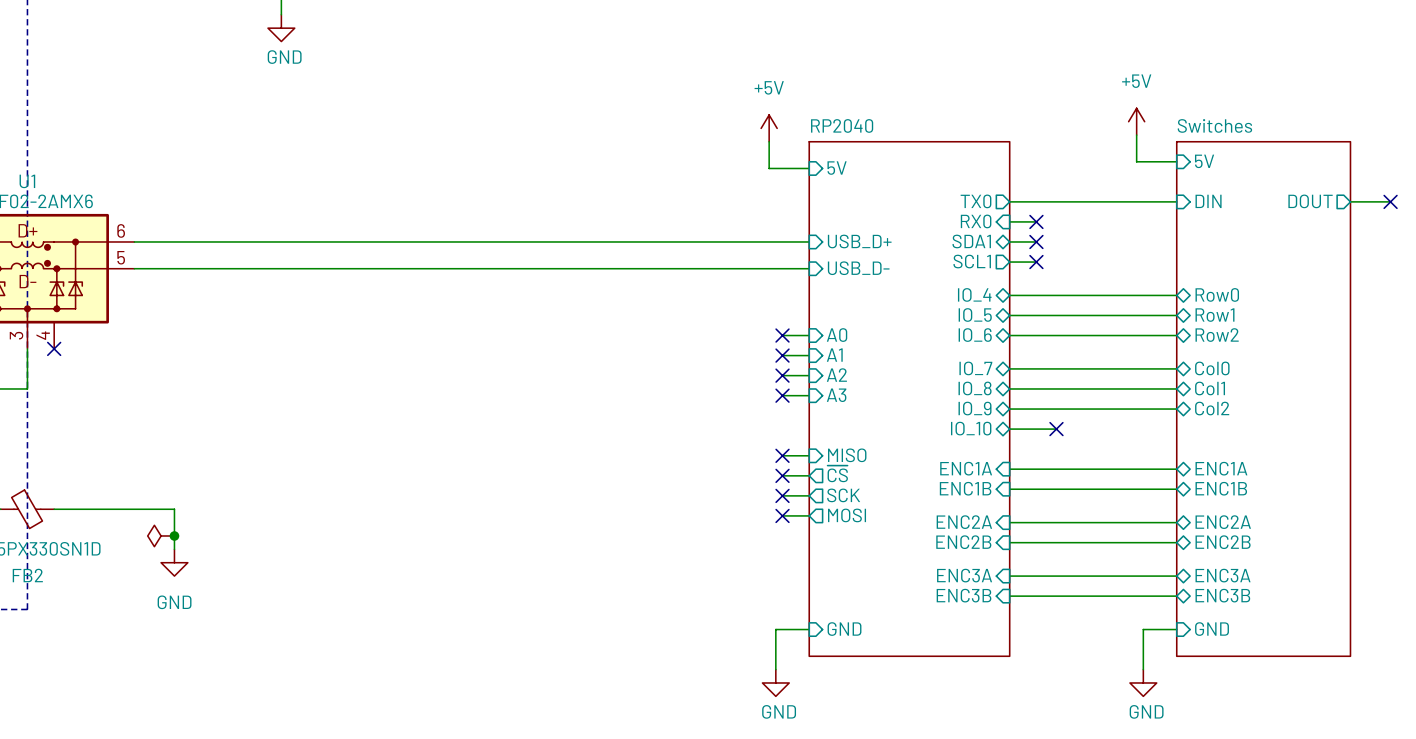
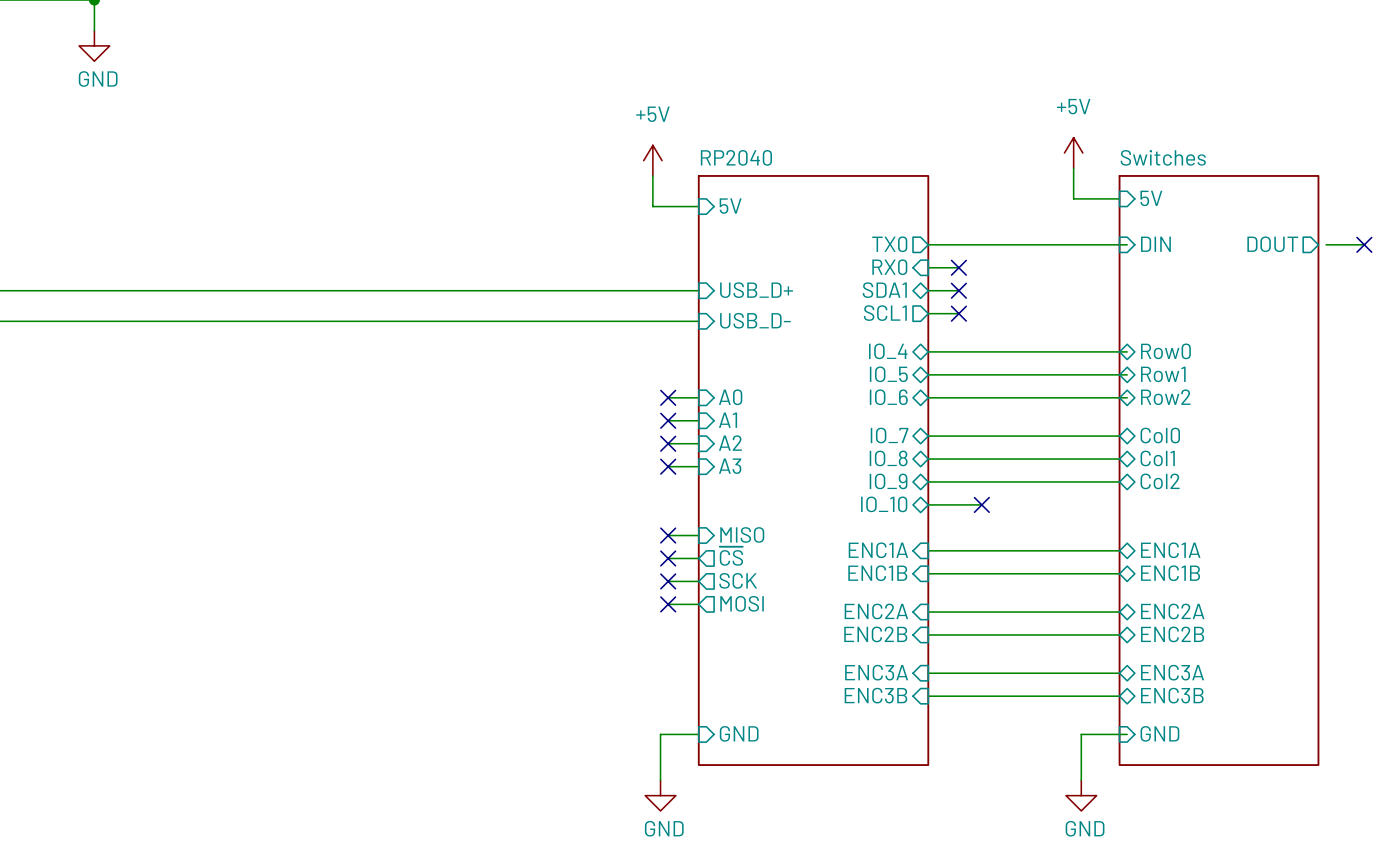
wire: (1350, 201) (1357, 201) -> (1119, 244) (1127, 244)
wire: none -> (1119, 351) (1127, 351)
wire: none -> (1119, 374) (1127, 374)
wire: none -> (1119, 397) (1127, 397)
wire: none -> (1119, 734) (1127, 734)

